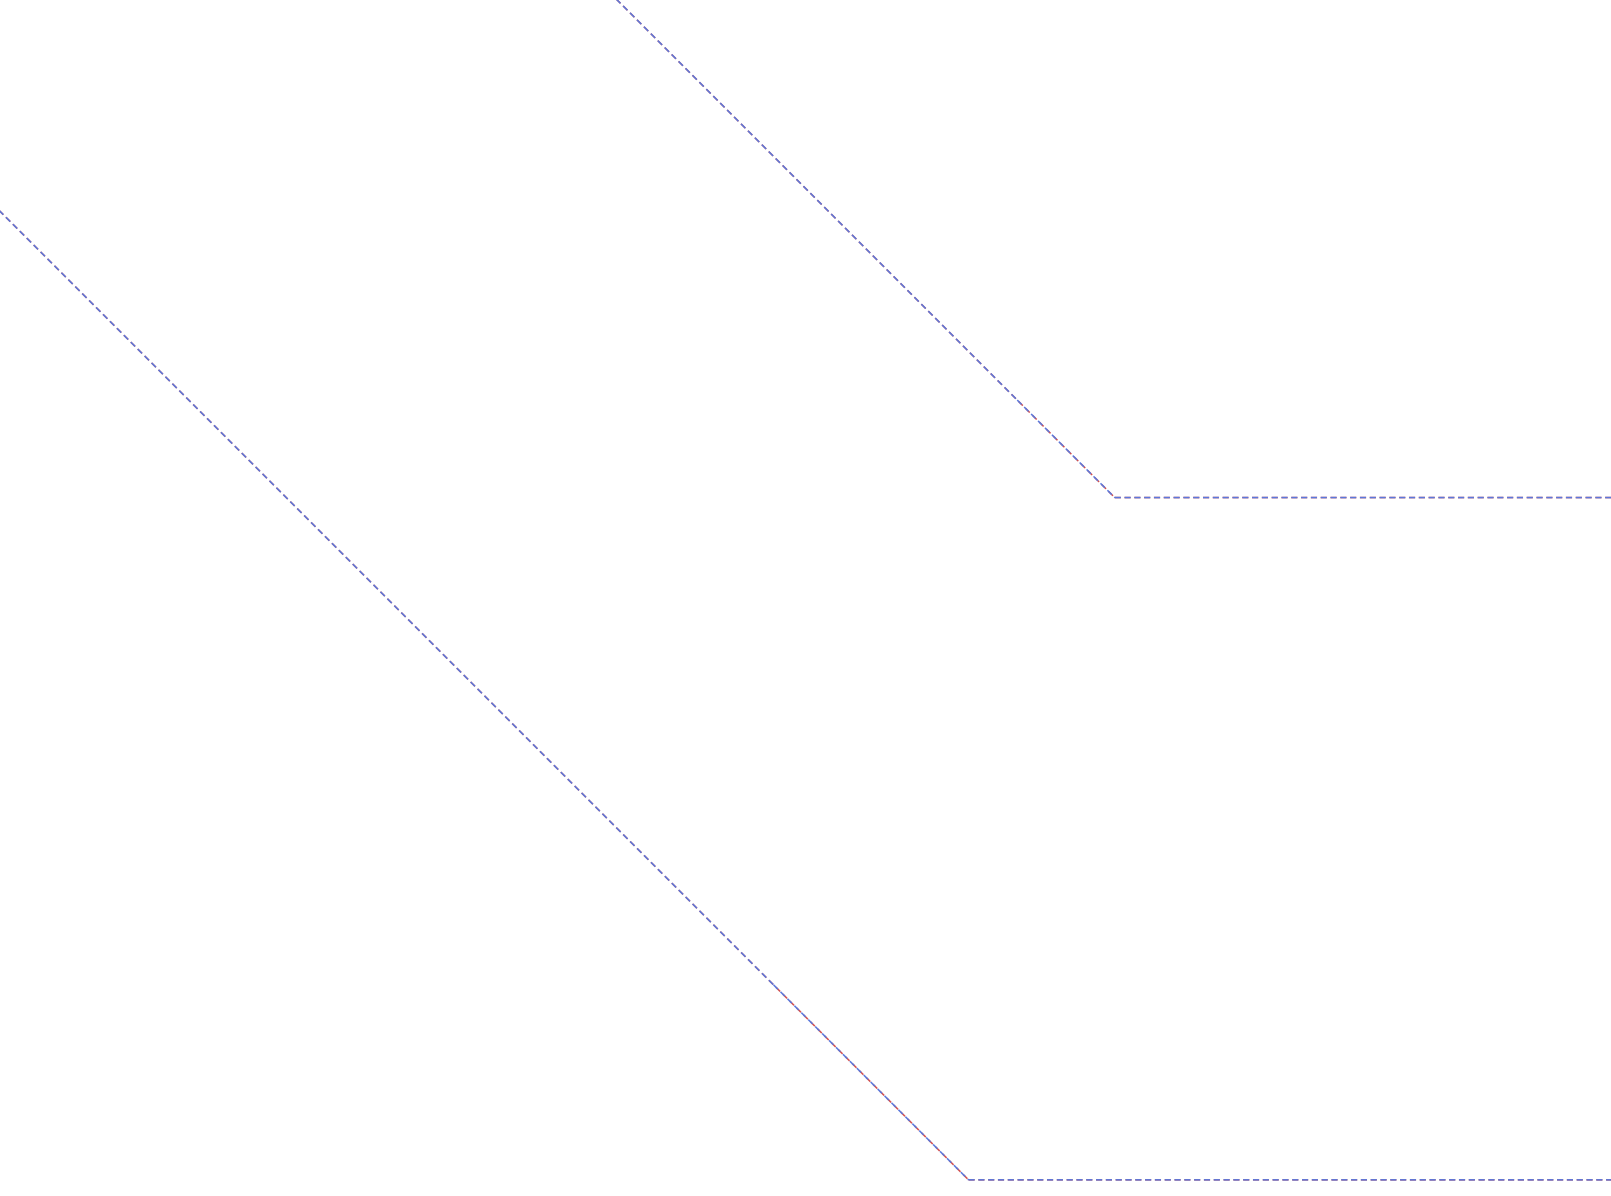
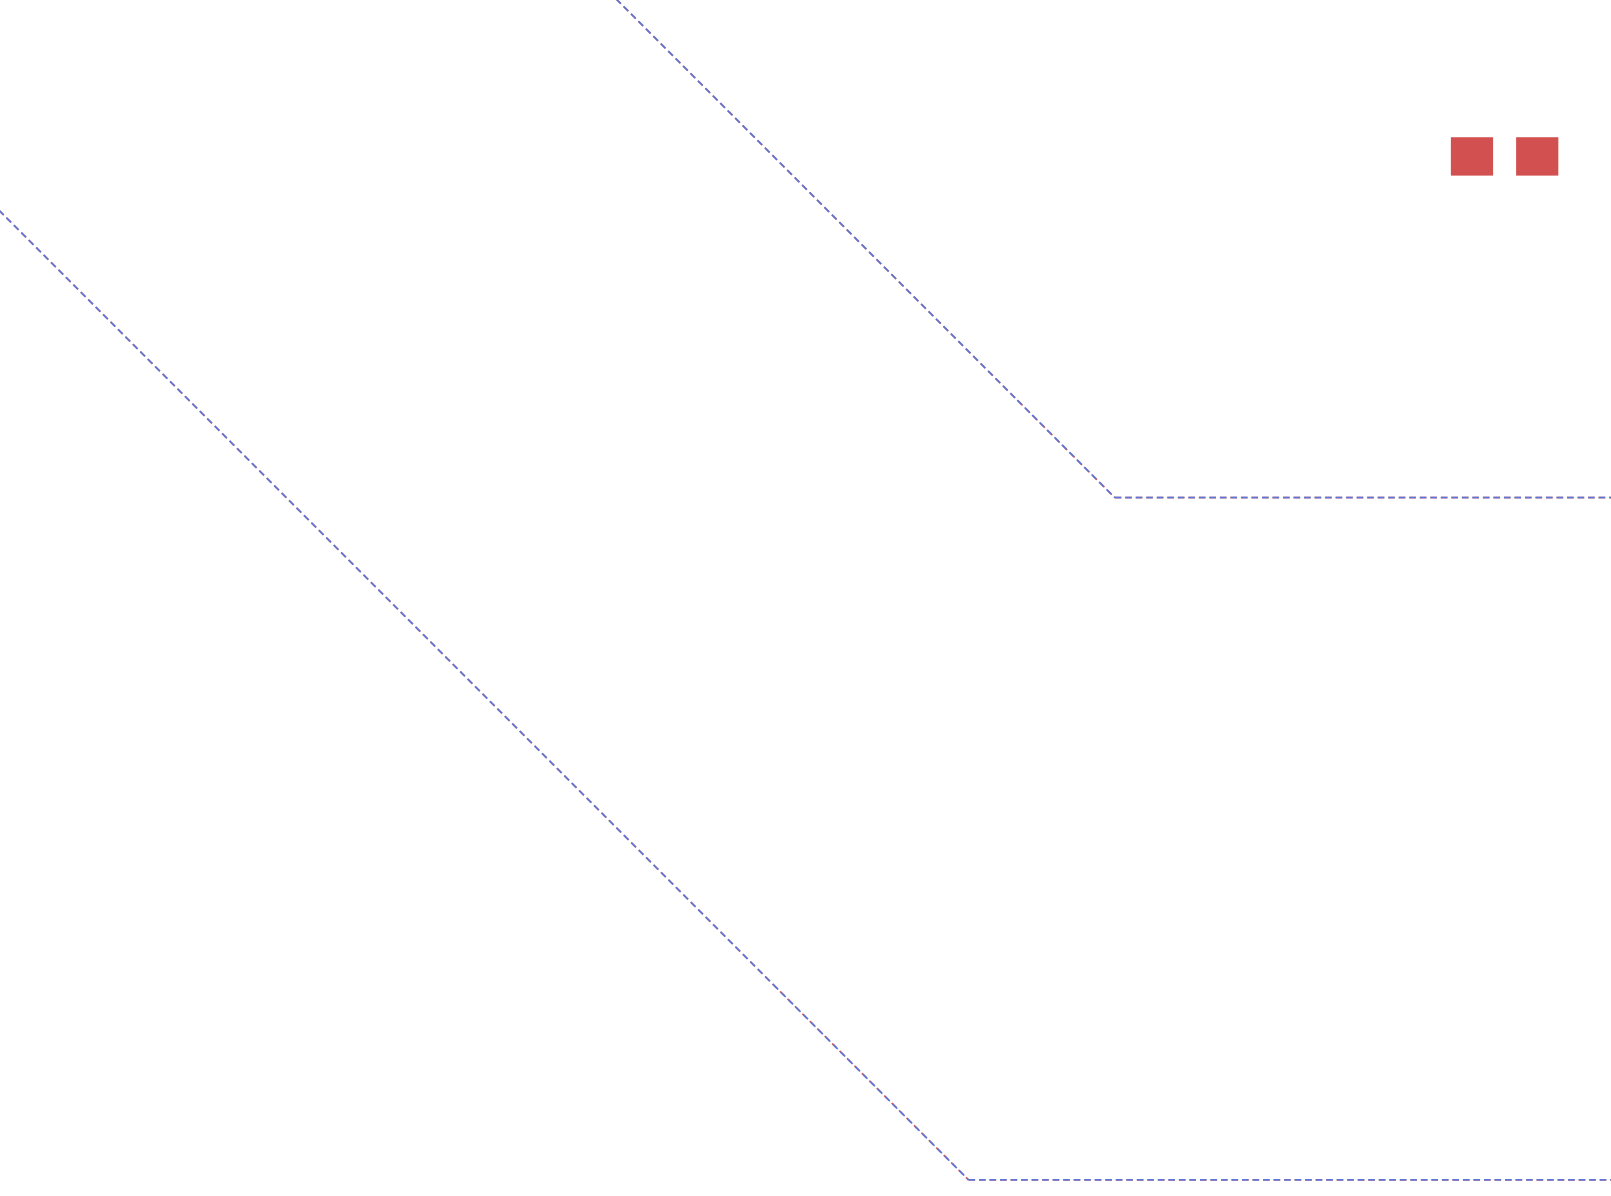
part: none -> (1504, 156)

